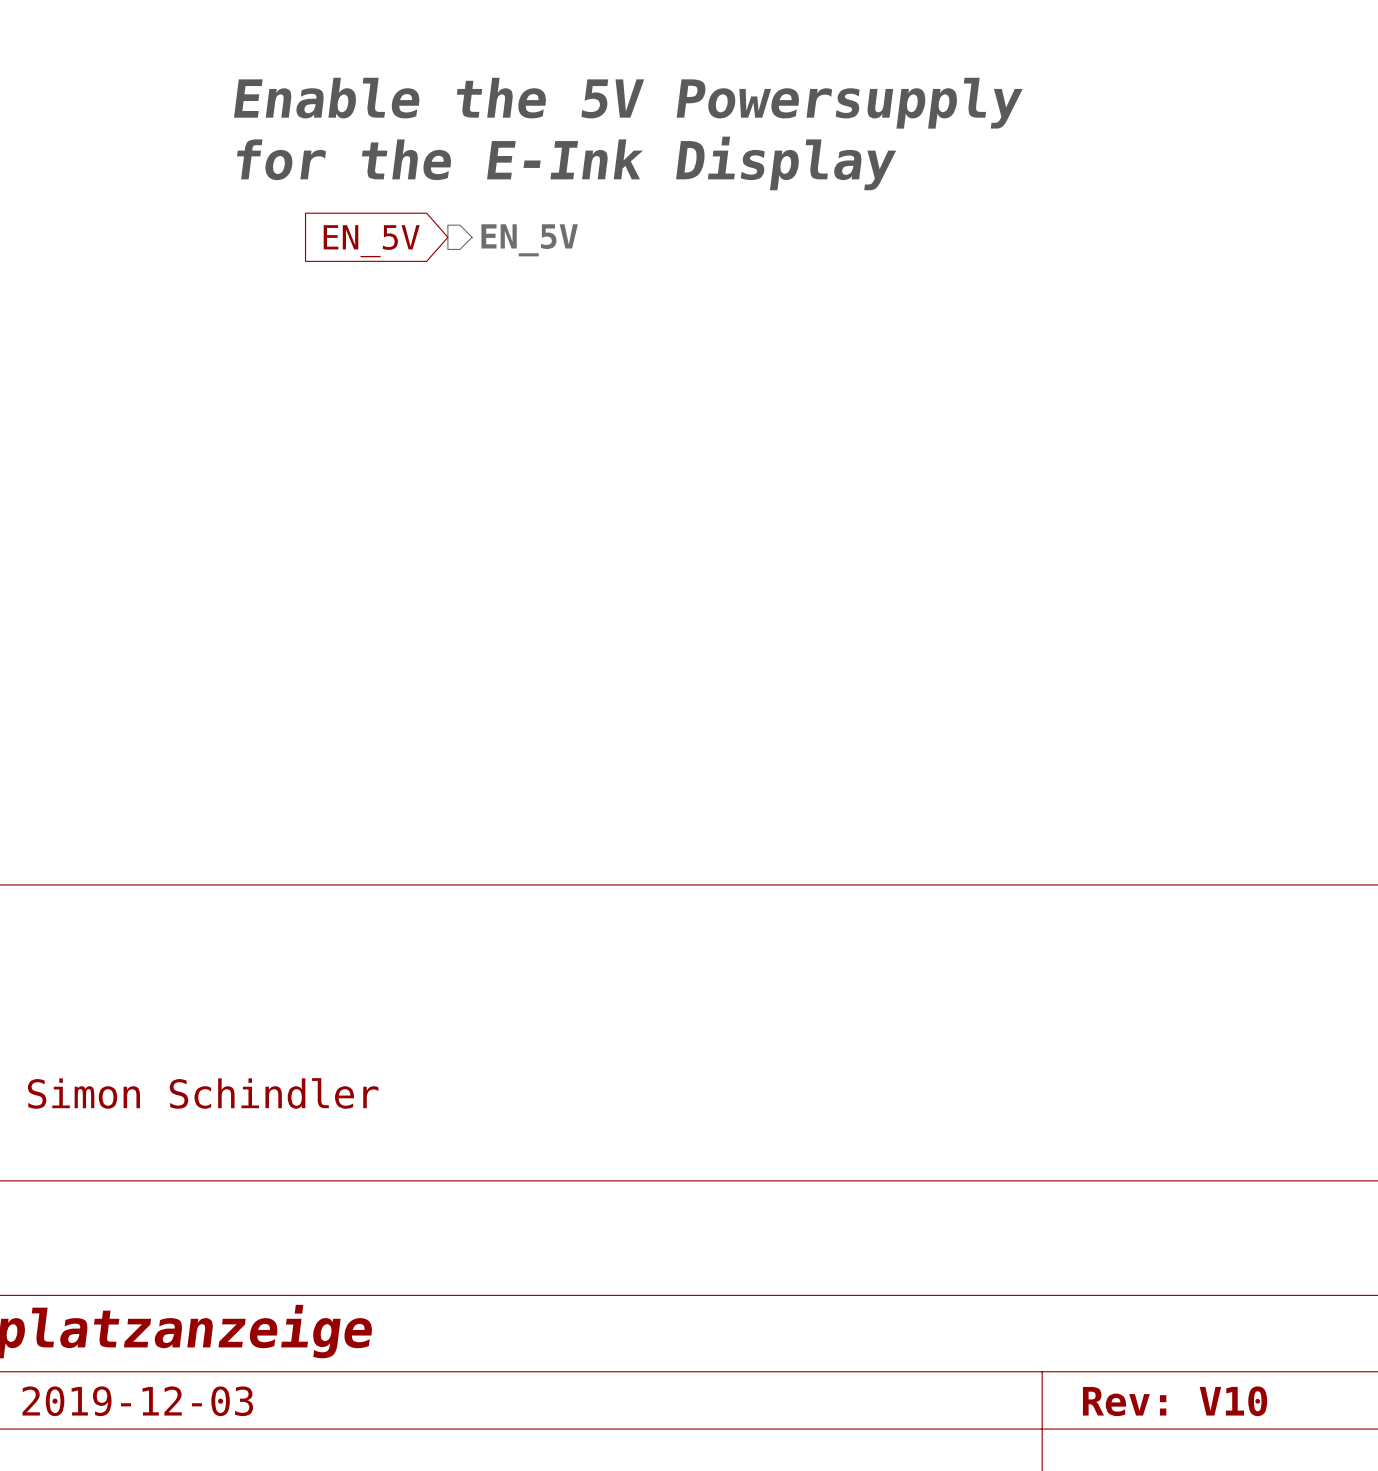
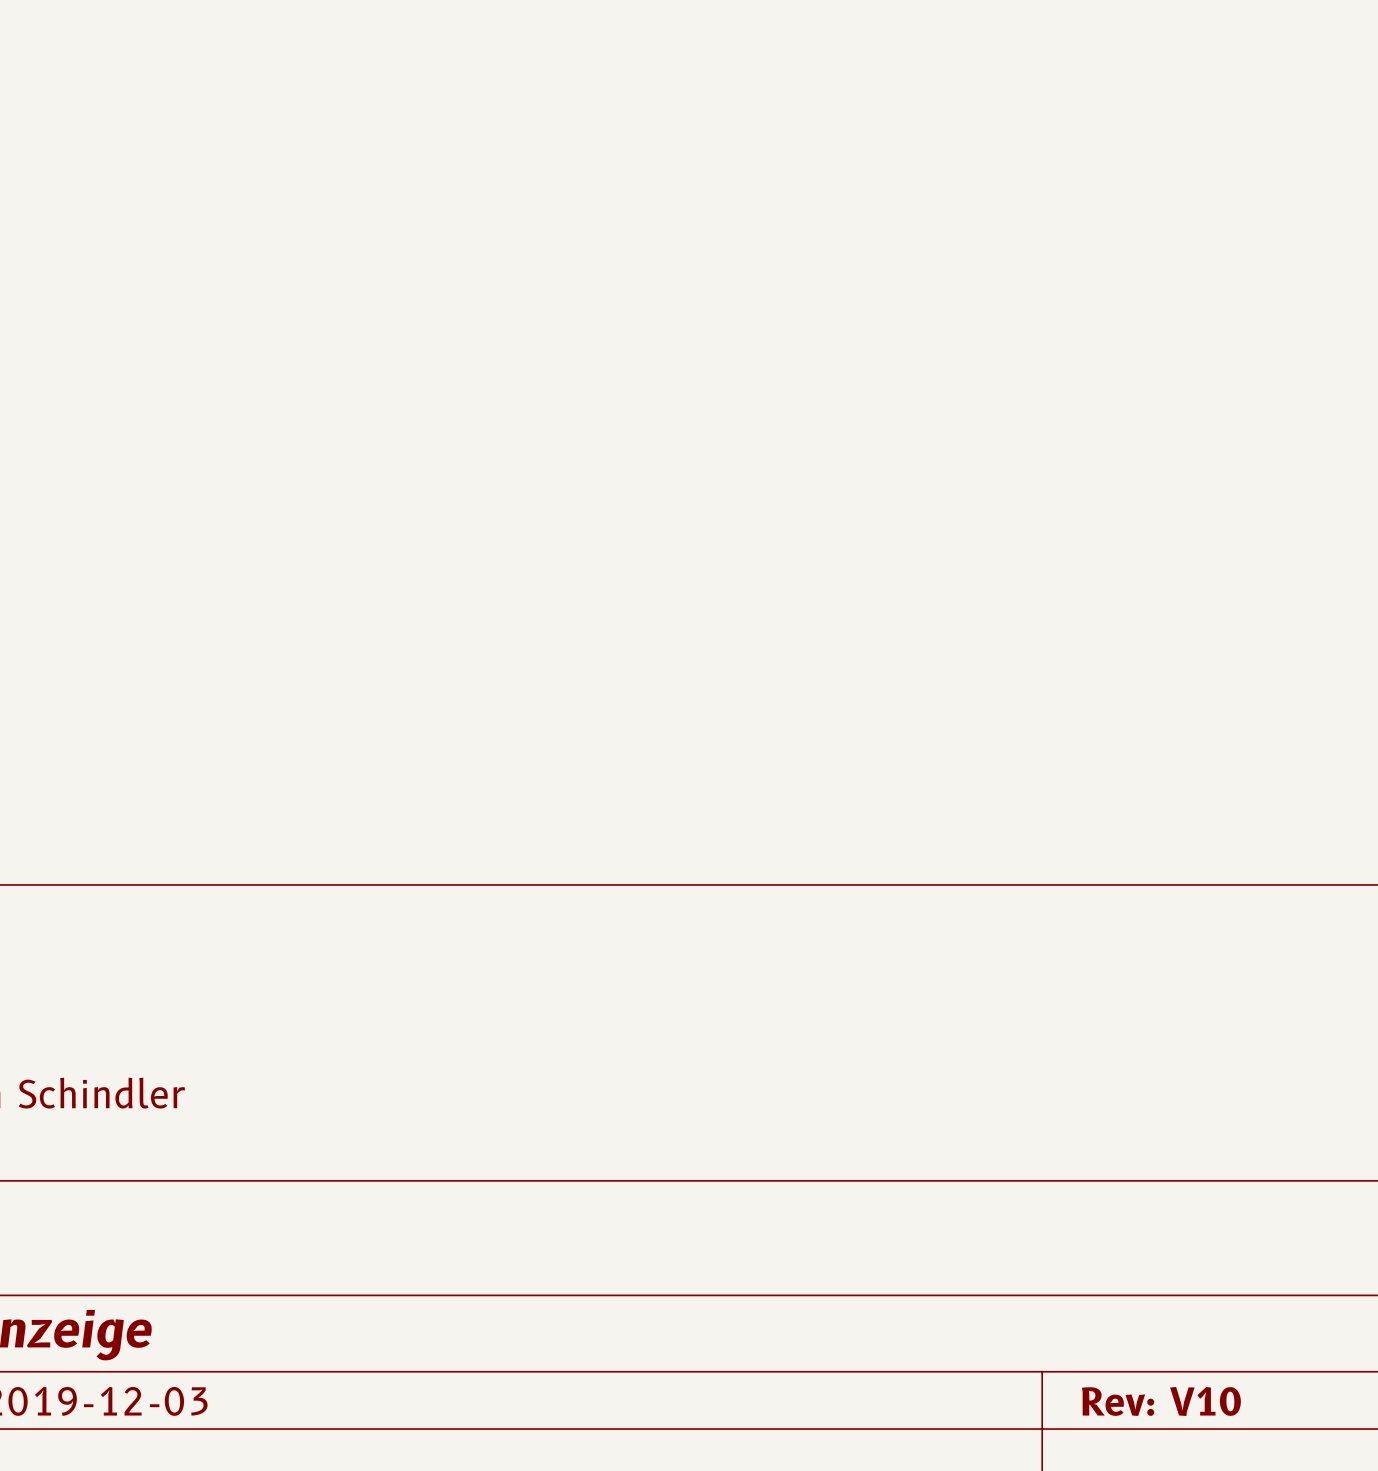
text: Enable the 5V Powersupply (628, 103) -> none
text: for the E-Ink Display (566, 163) -> none
hierarchical label: EN_5V (529, 240) -> none
global label: EN_5V (371, 241) -> none

